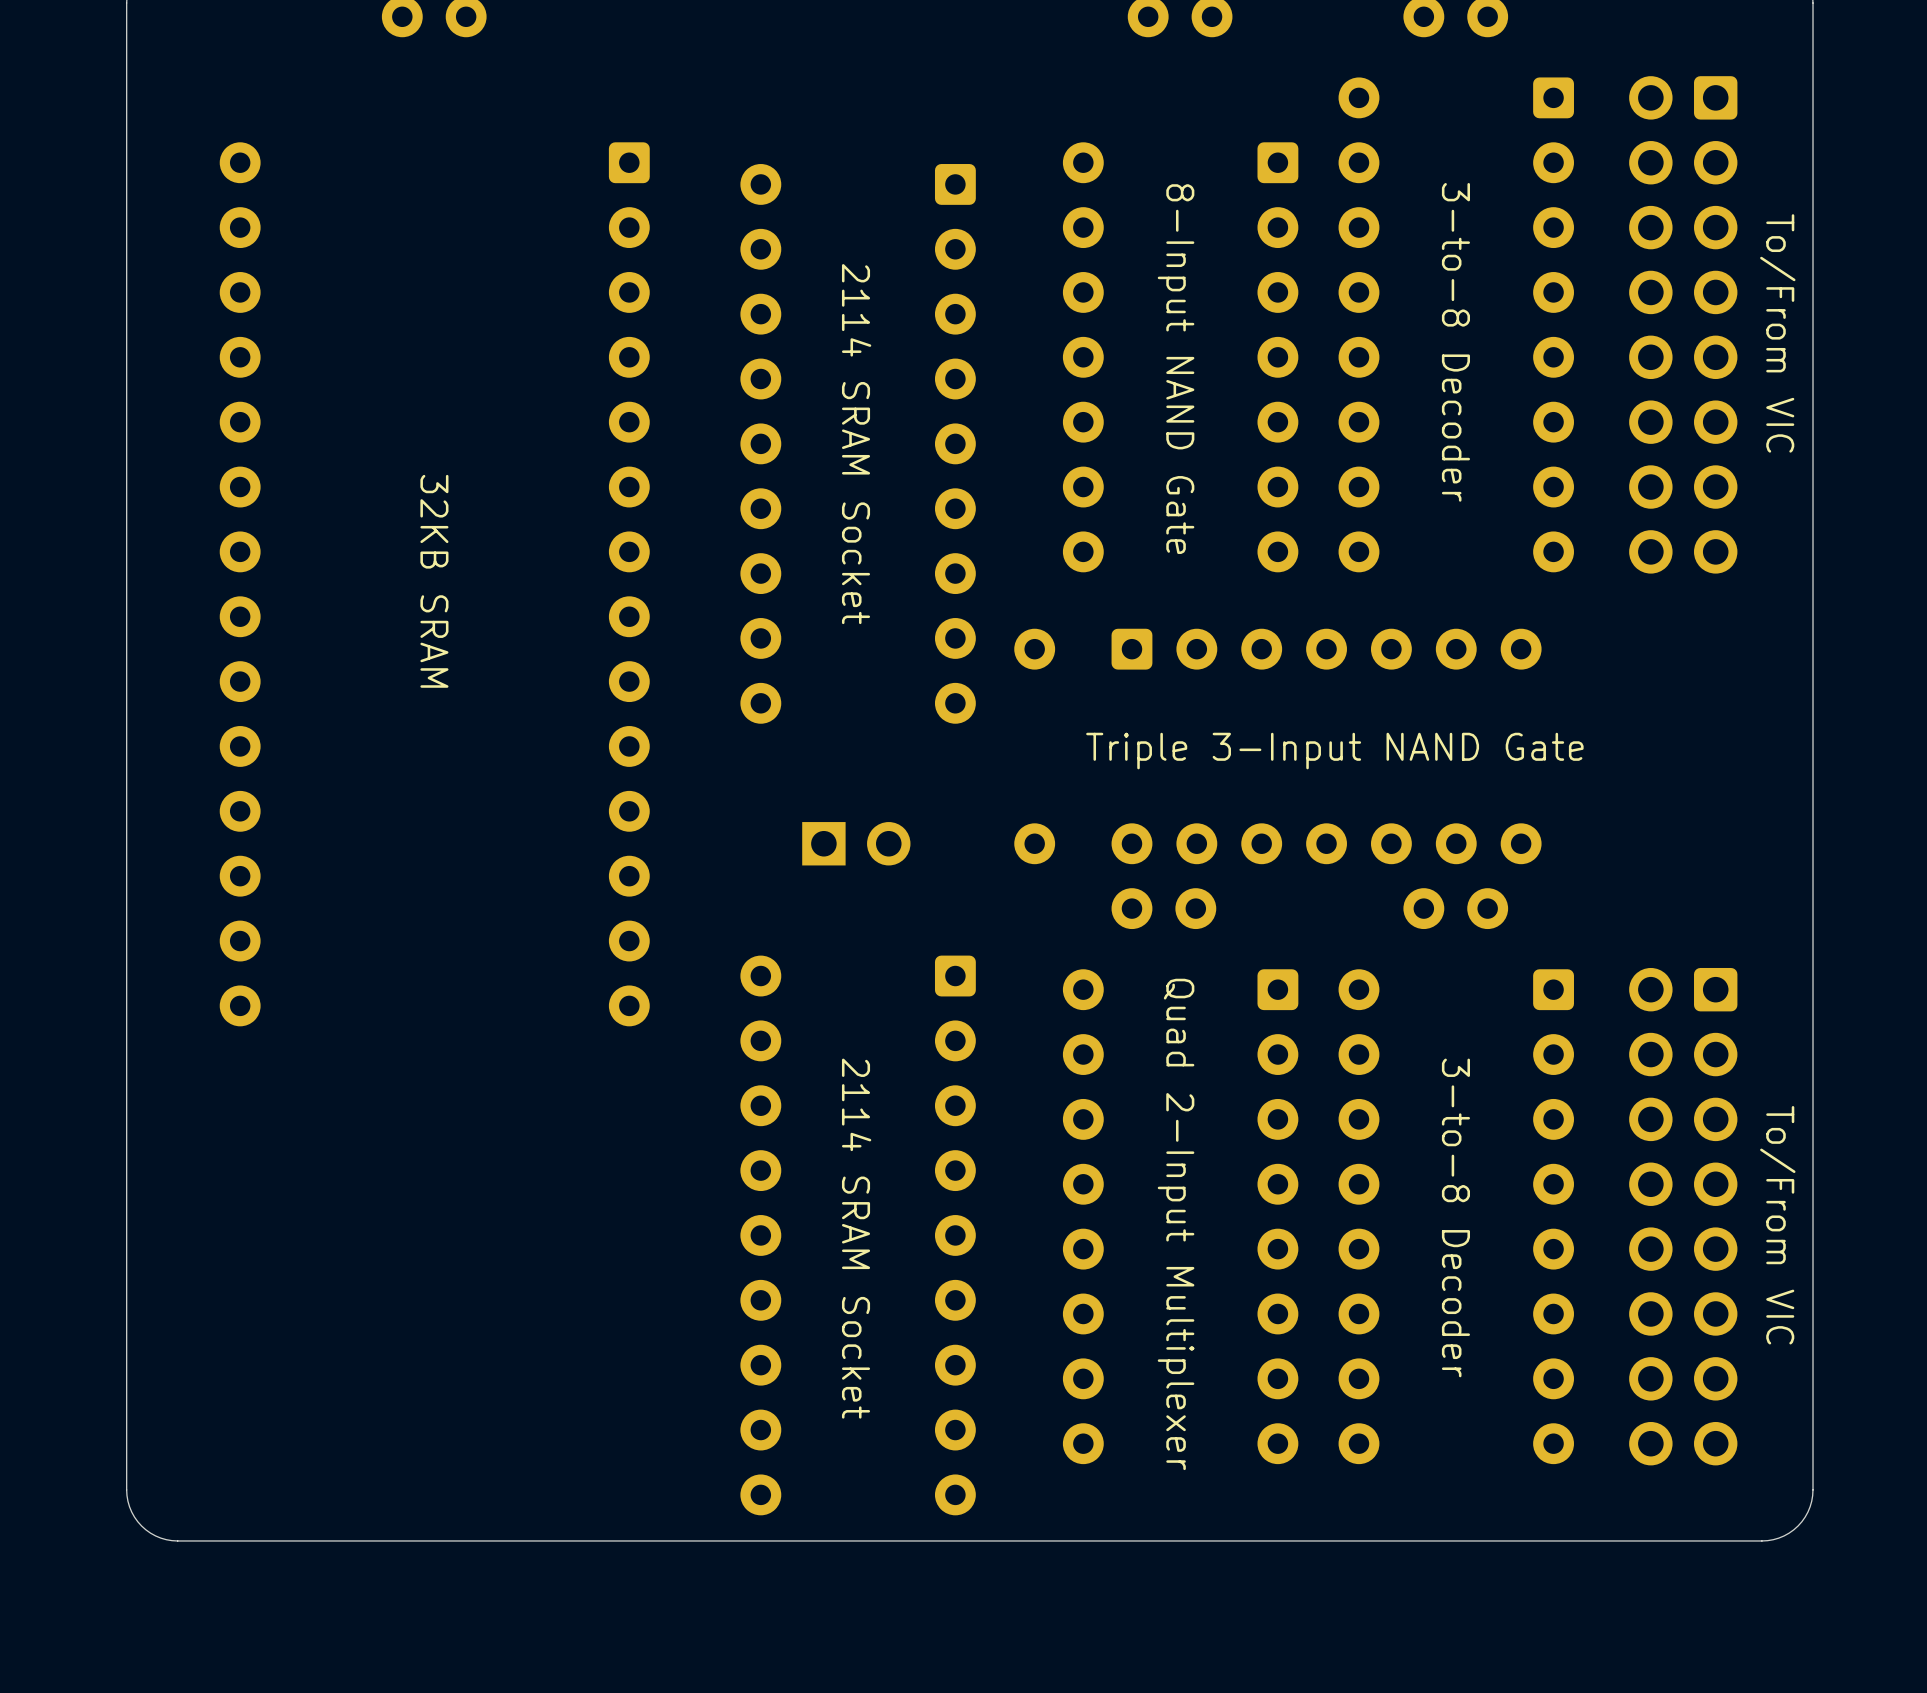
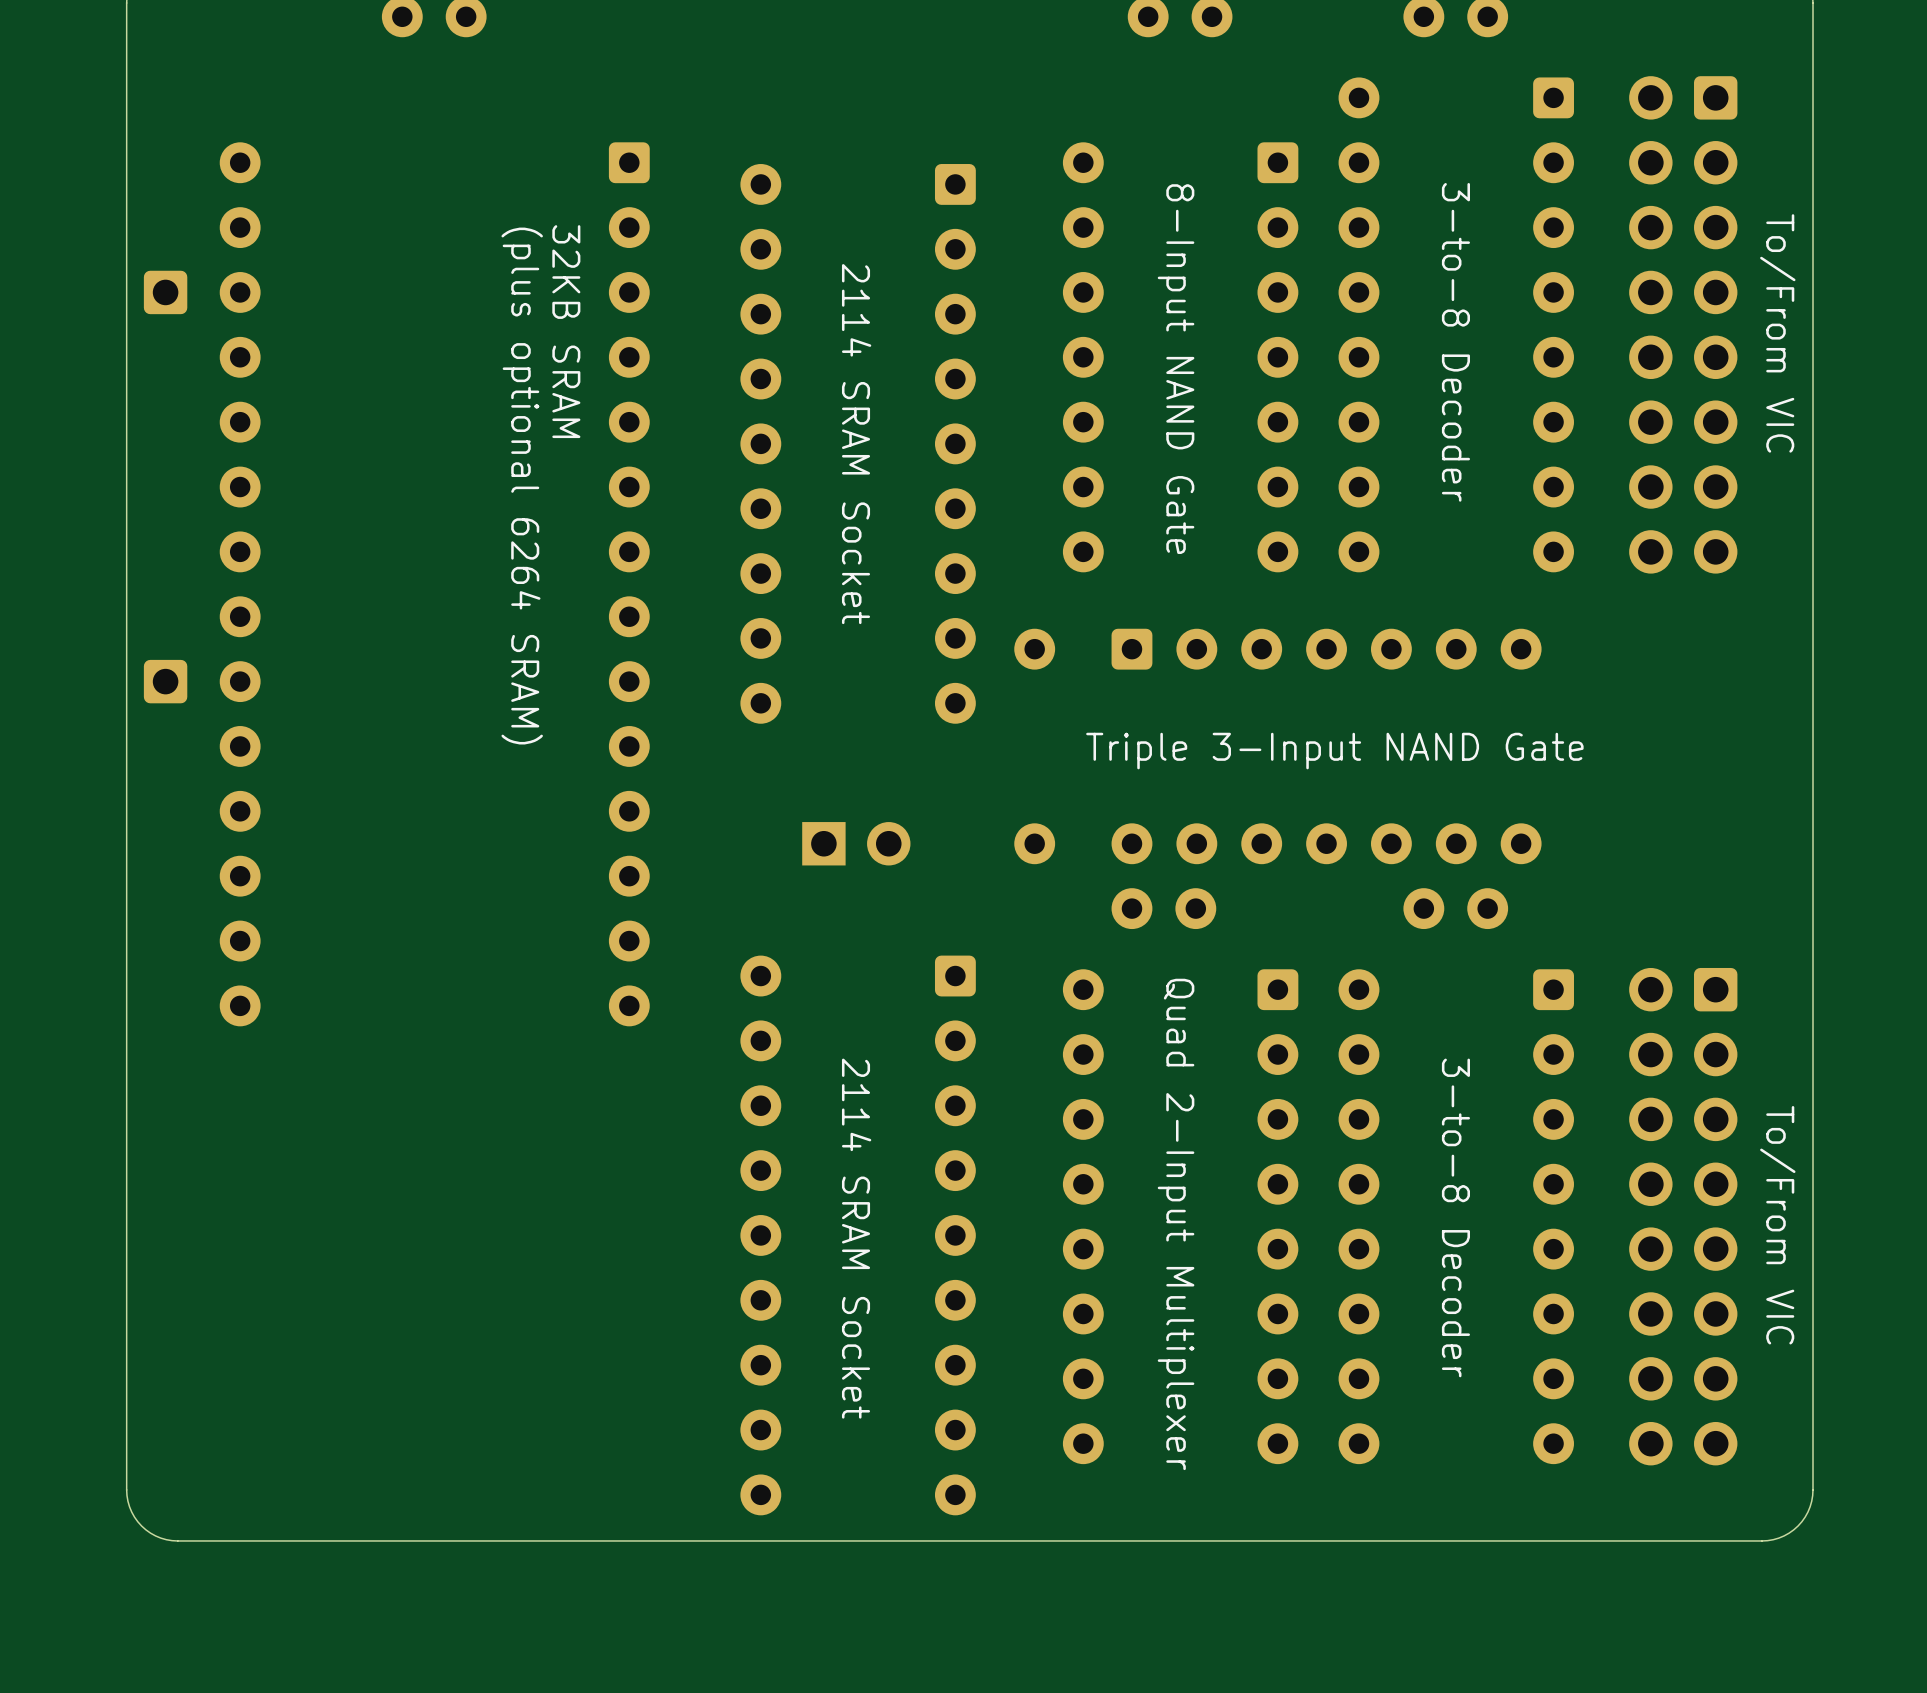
part: none -> (165, 292)
text: none -> (plus optional 6264 SRAM) (522, 486)
text position: 32KB SRAM (434, 581) -> 32KB SRAM (566, 331)
part: none -> (165, 681)

